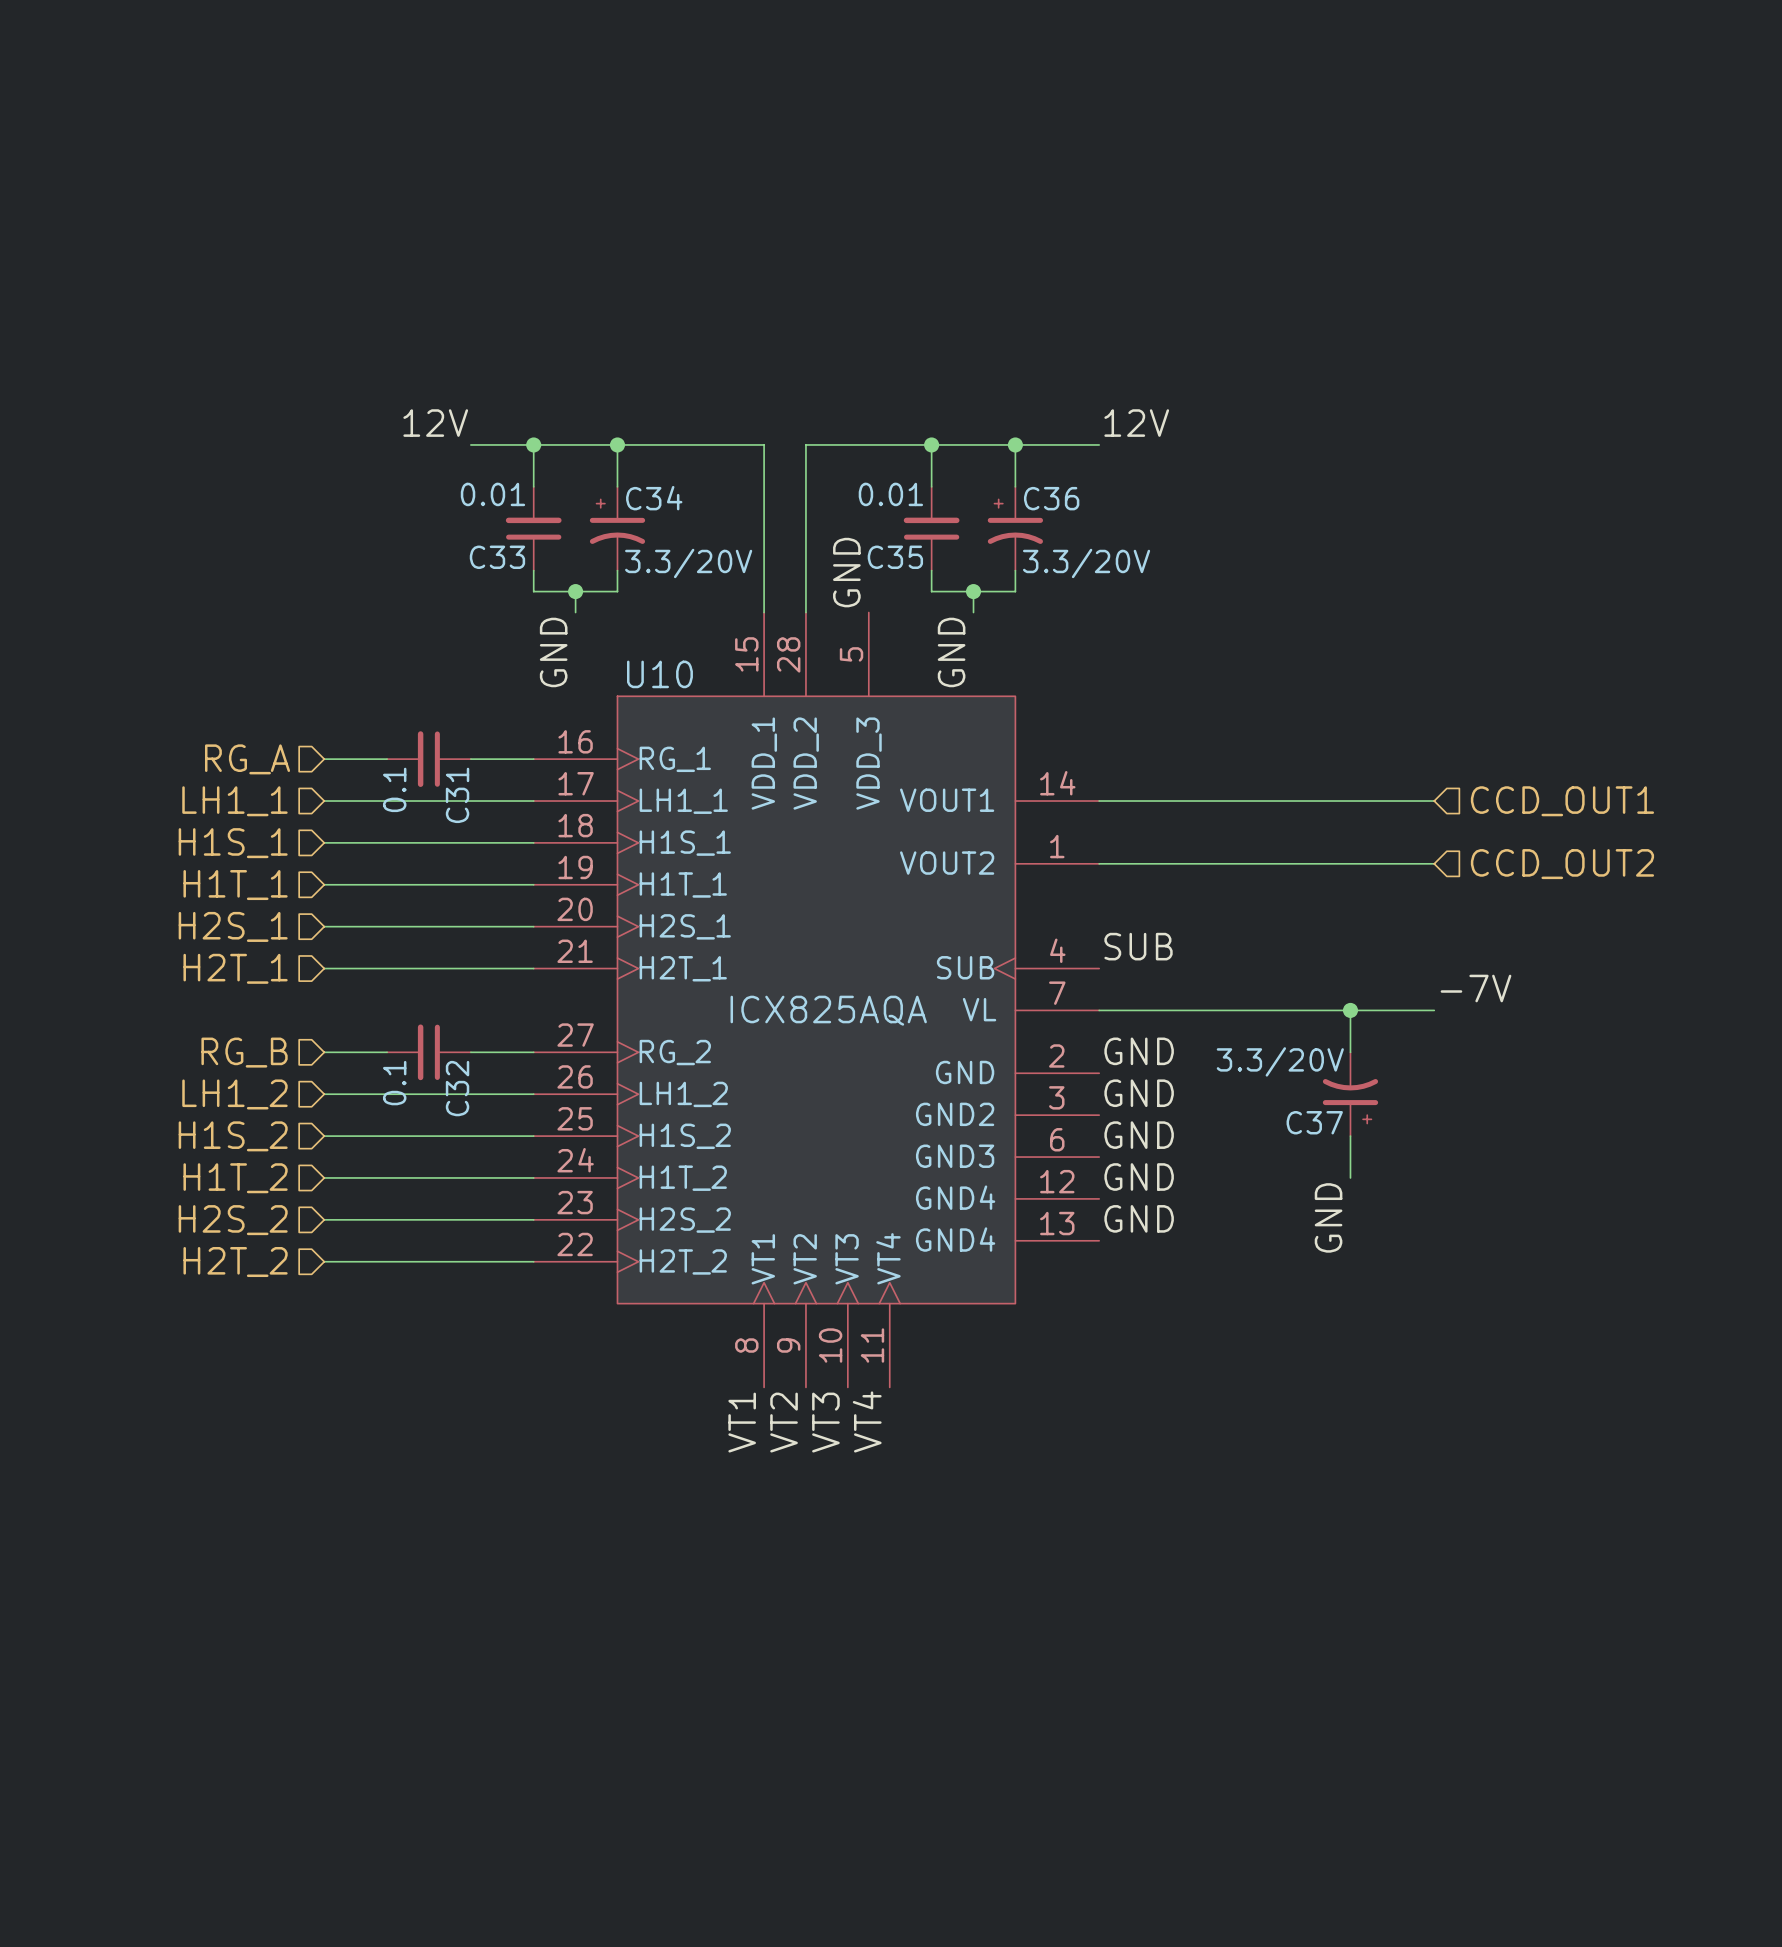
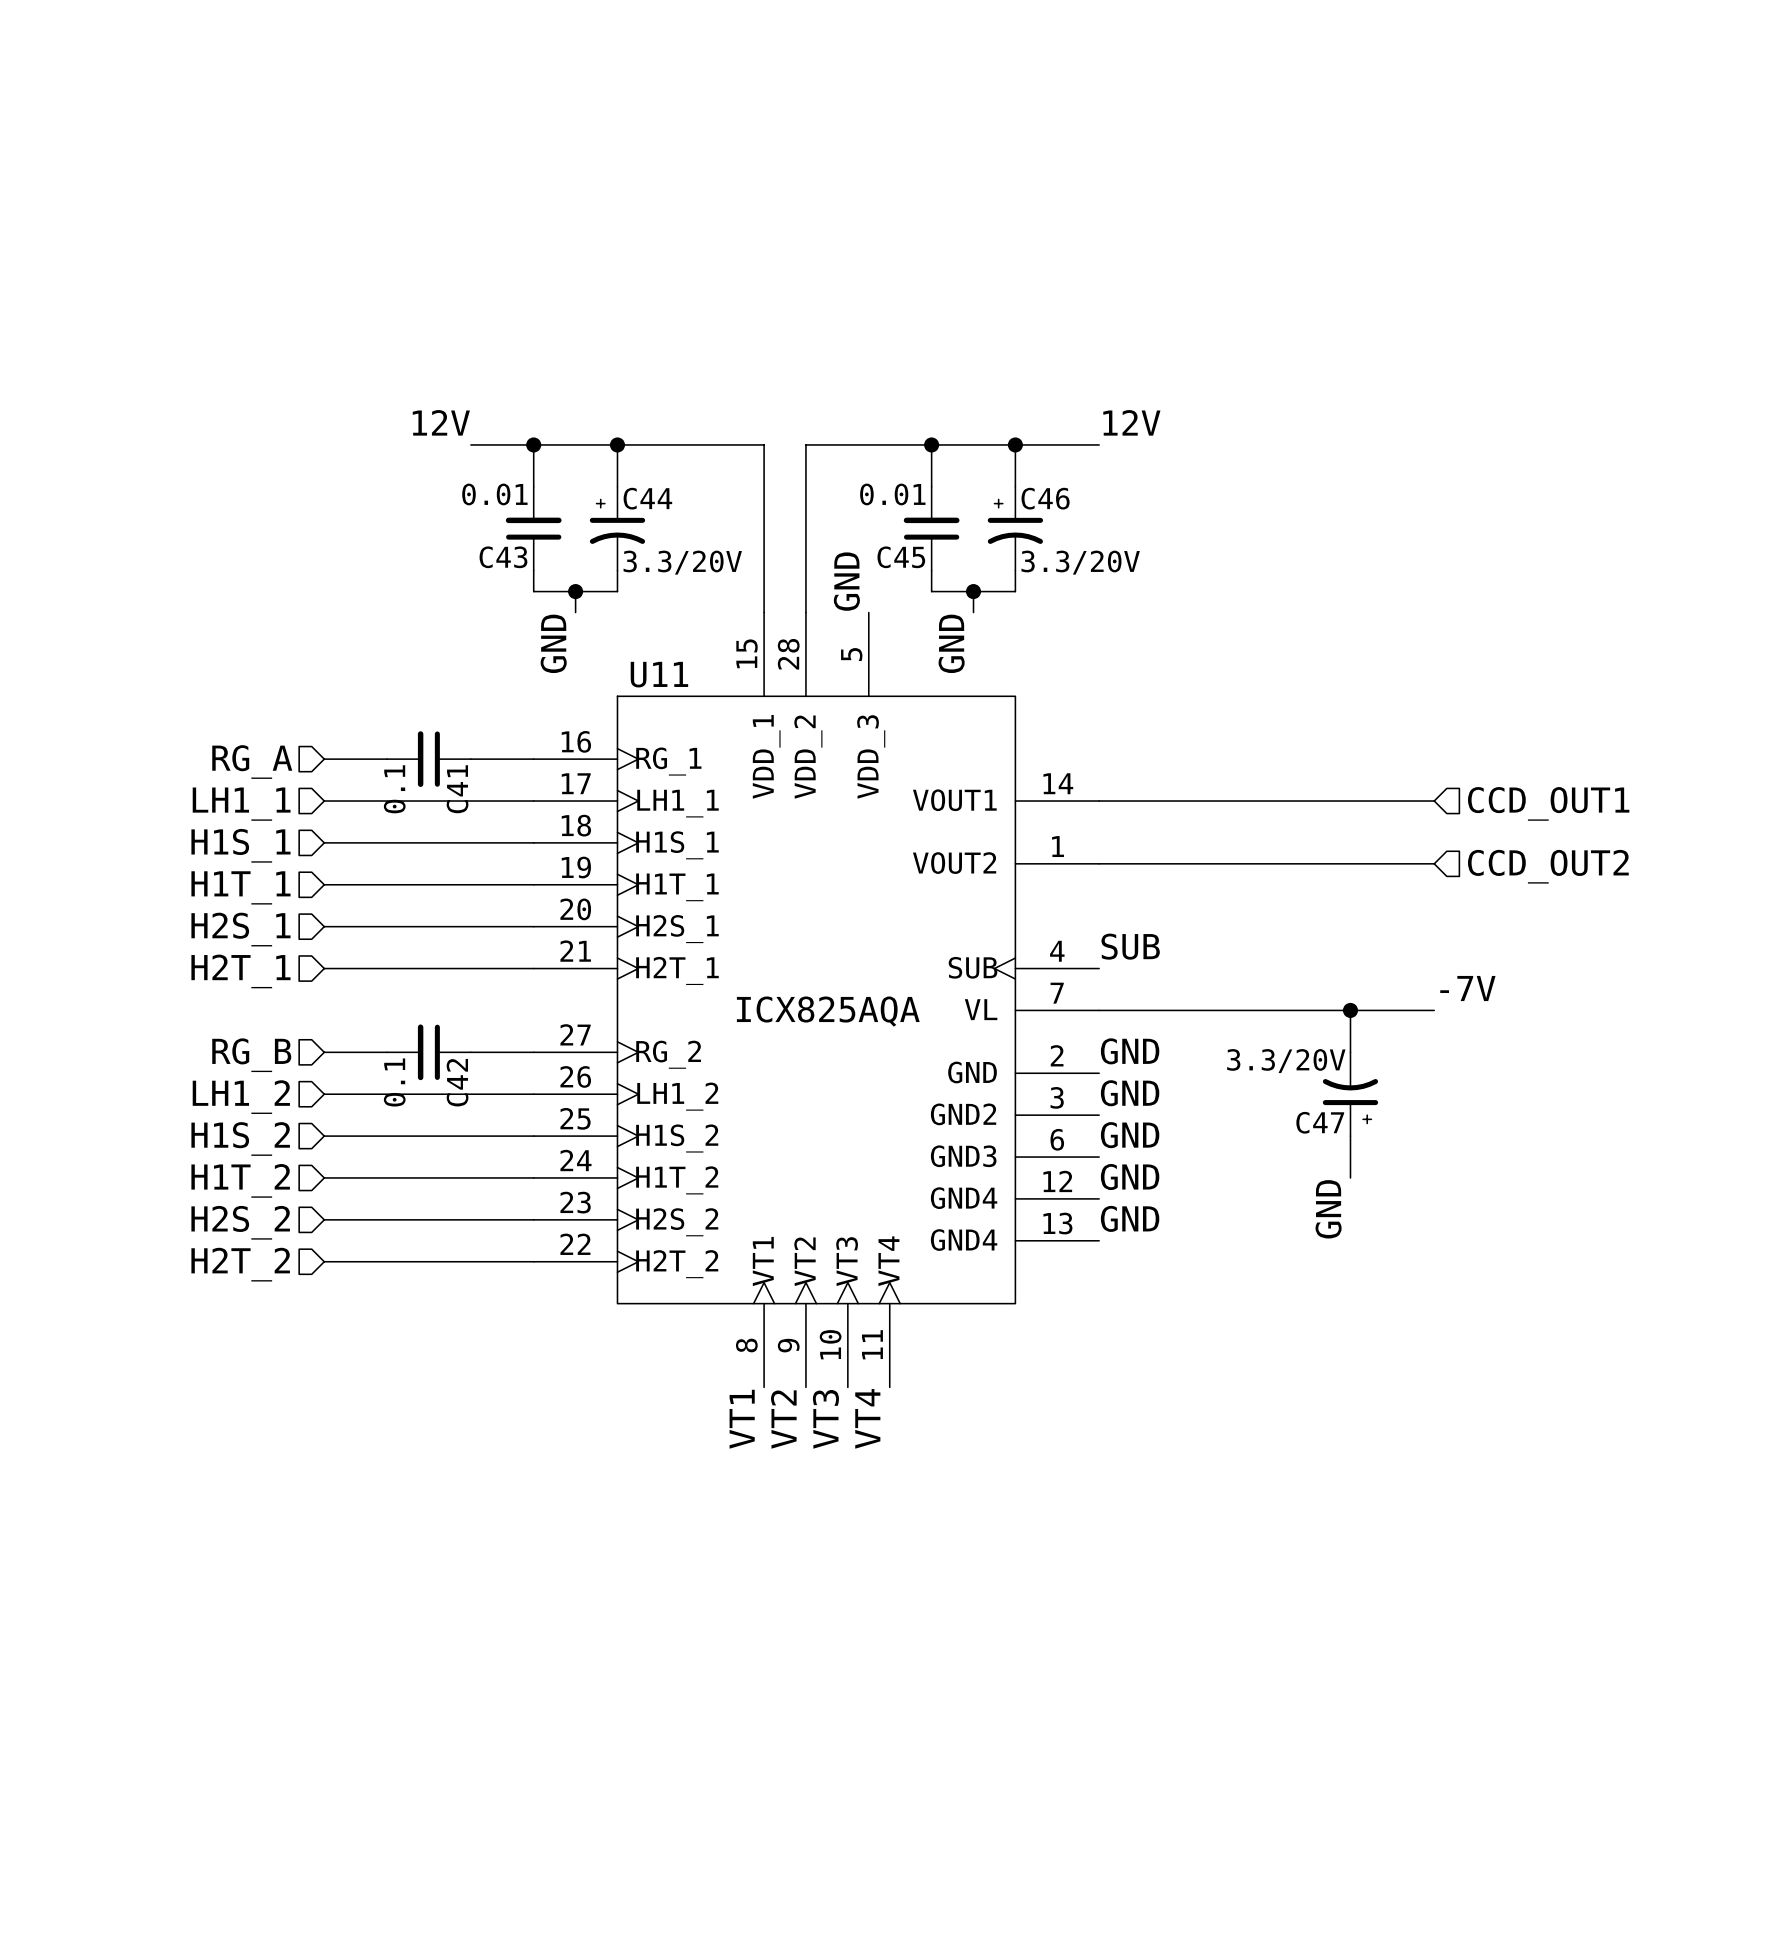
C34 name: C34 (654, 498) -> C44 (647, 498)
C36 name: C36 (1051, 498) -> C46 (1045, 498)
C33 name: C33 (497, 557) -> C43 (503, 557)
C35 name: C35 (895, 557) -> C45 (901, 557)
U10 name: U10 (659, 674) -> U11 (659, 674)
C31 name: C31 (457, 795) -> C41 (457, 789)
C32 name: C32 (457, 1088) -> C42 (457, 1082)
C37 name: C37 (1314, 1122) -> C47 (1320, 1122)

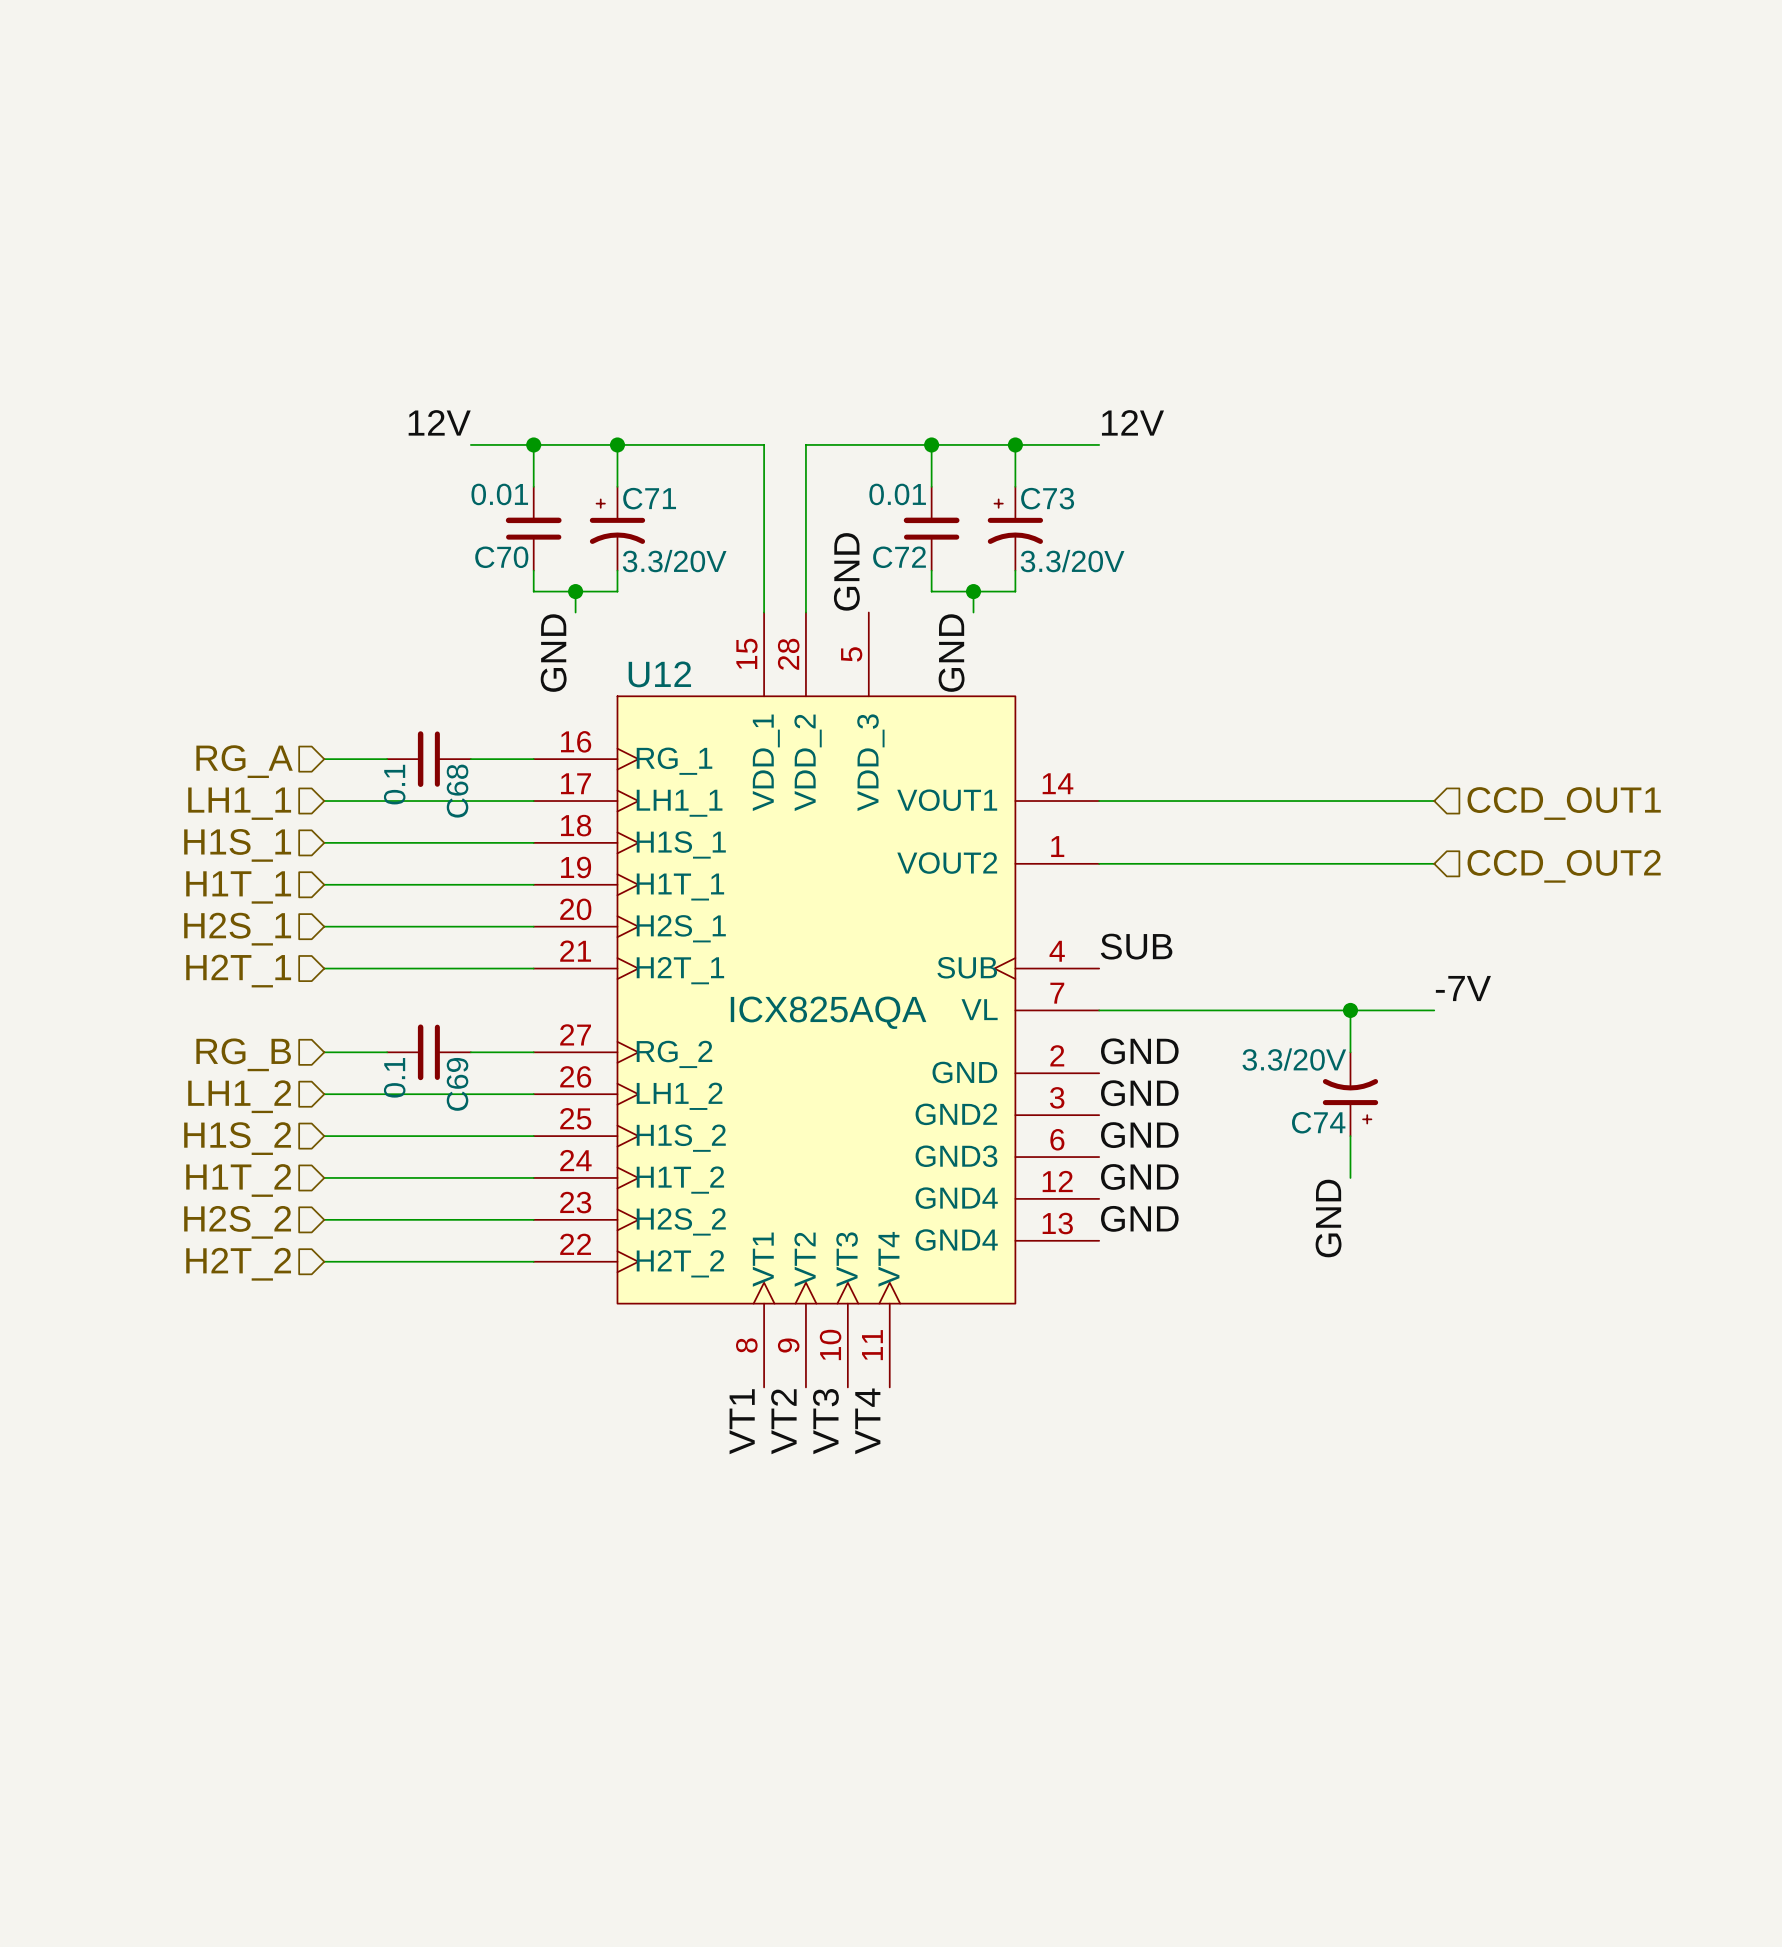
C44 name: C44 (647, 498) -> C71 (649, 498)
C46 name: C46 (1045, 498) -> C73 (1047, 498)
C43 name: C43 (503, 557) -> C70 (501, 557)
C45 name: C45 (901, 557) -> C72 (899, 557)
U11 name: U11 (659, 674) -> U12 (659, 674)
C41 name: C41 (457, 789) -> C68 (457, 791)
C42 name: C42 (457, 1082) -> C69 (457, 1084)
C47 name: C47 (1320, 1122) -> C74 (1318, 1122)

